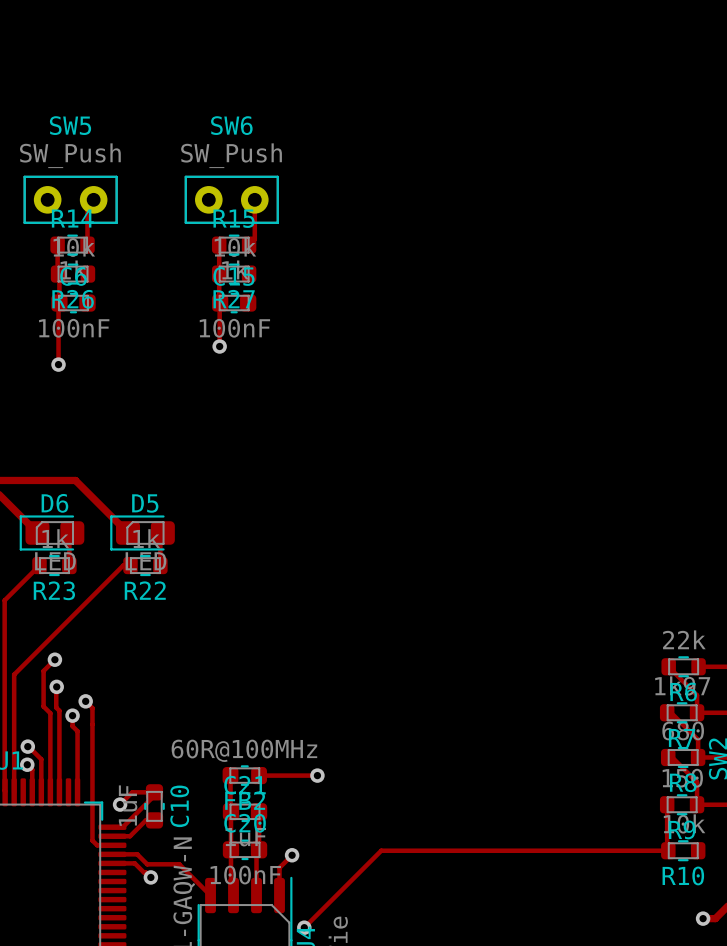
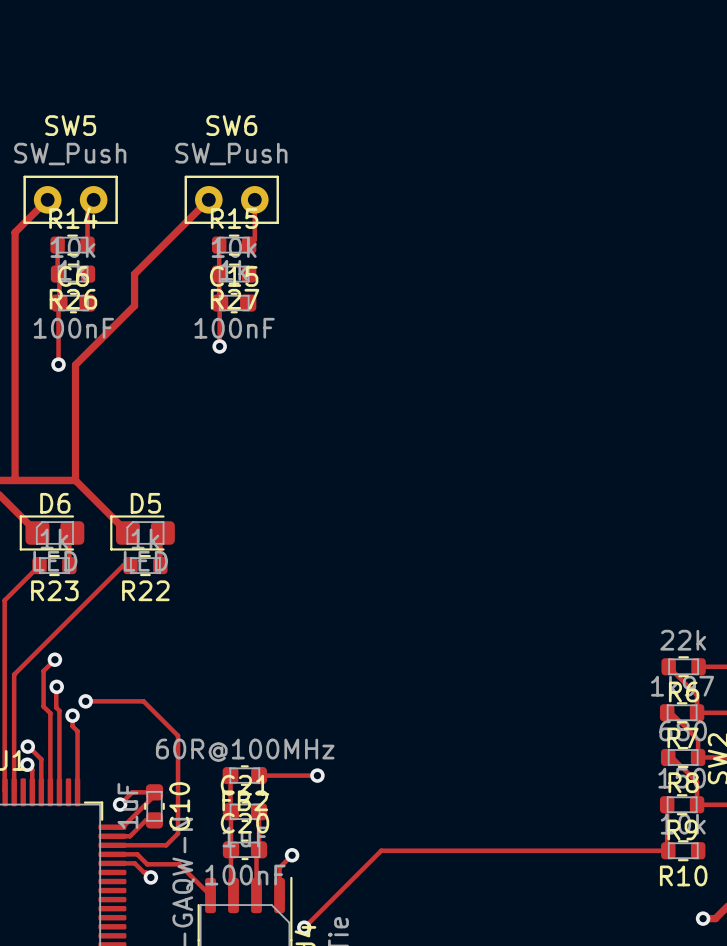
track: none -> (47, 199) (15, 232) (15, 480)
track: none -> (208, 199) (134, 274) (134, 305) (75, 364) (75, 480)
track: (85, 701) (92, 708) (92, 840) (97, 845) (112, 845) -> (85, 701) (143, 701) (178, 735) (178, 833) (166, 845) (112, 845)

